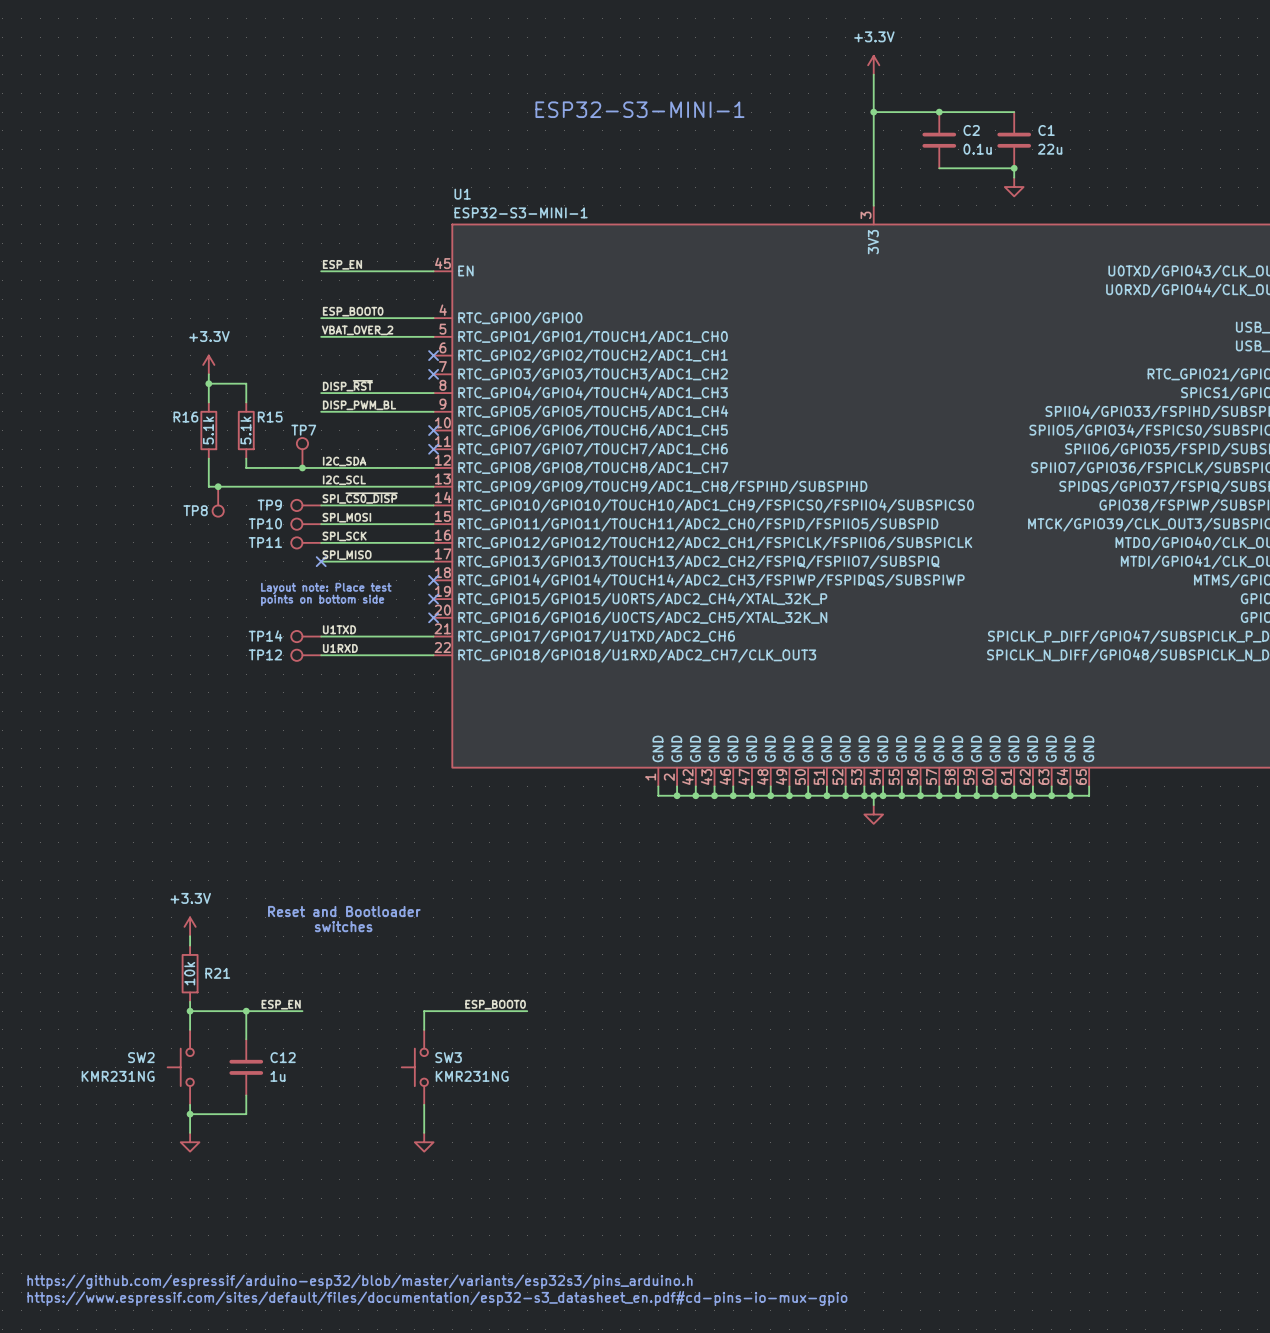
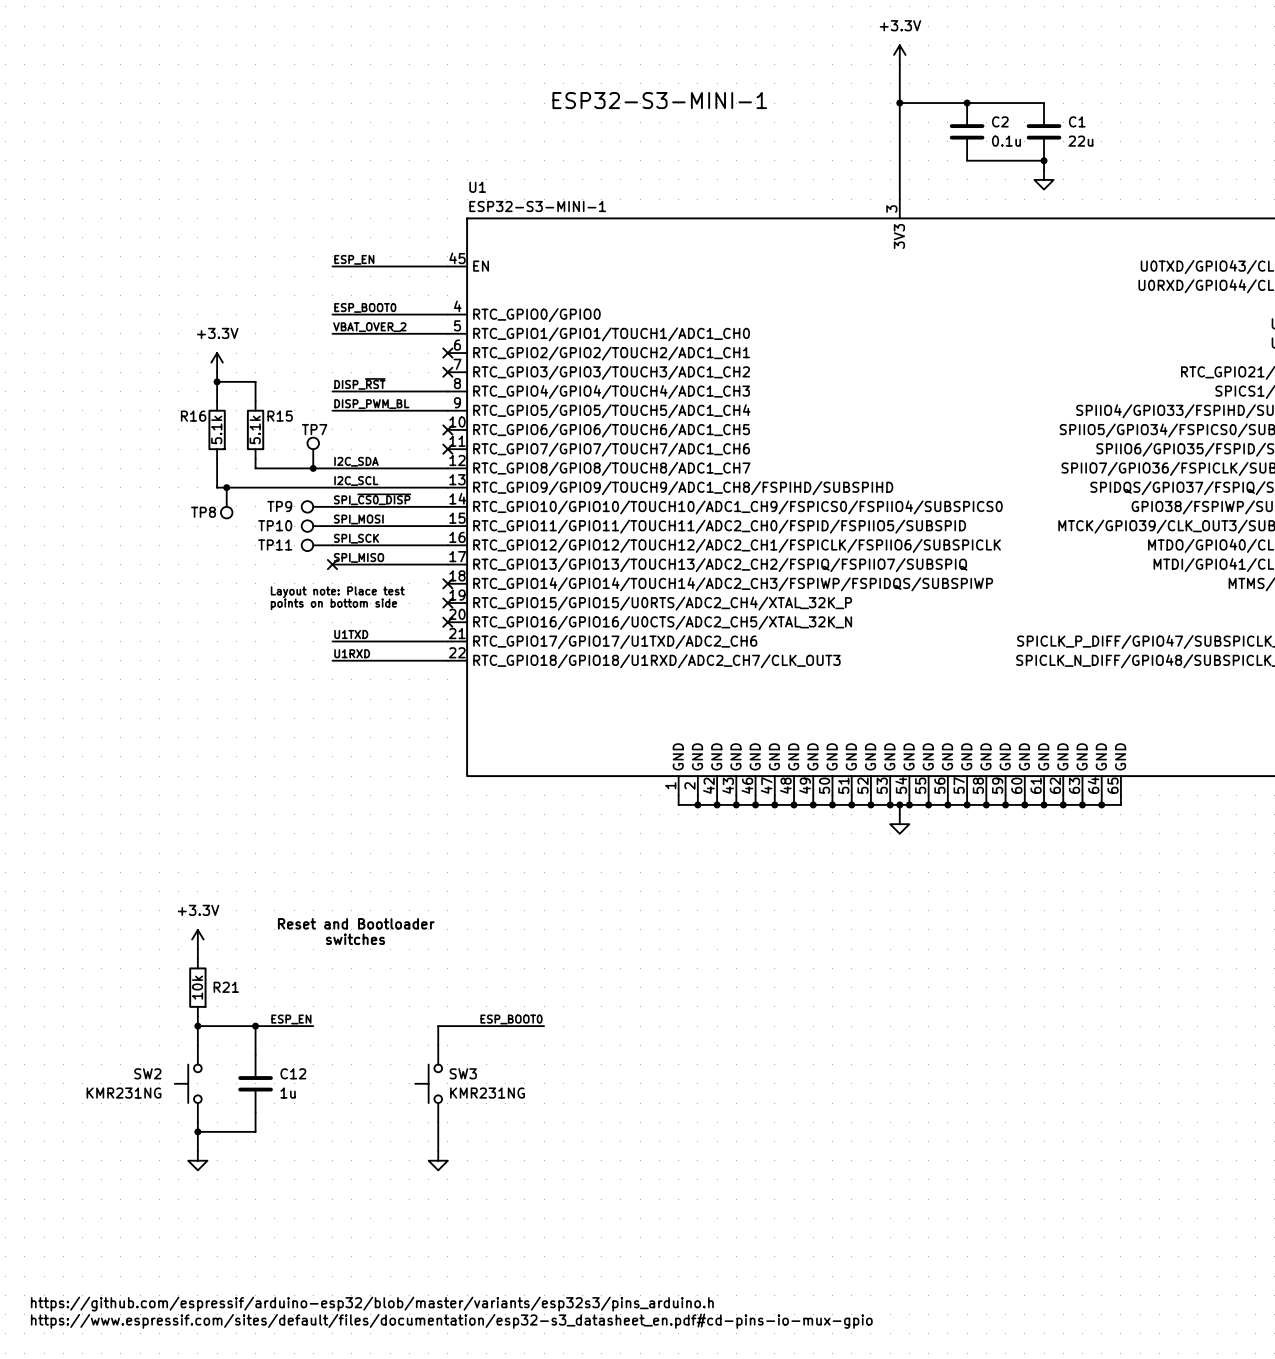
TP14: (306, 636) -> none
TP12: (306, 655) -> none

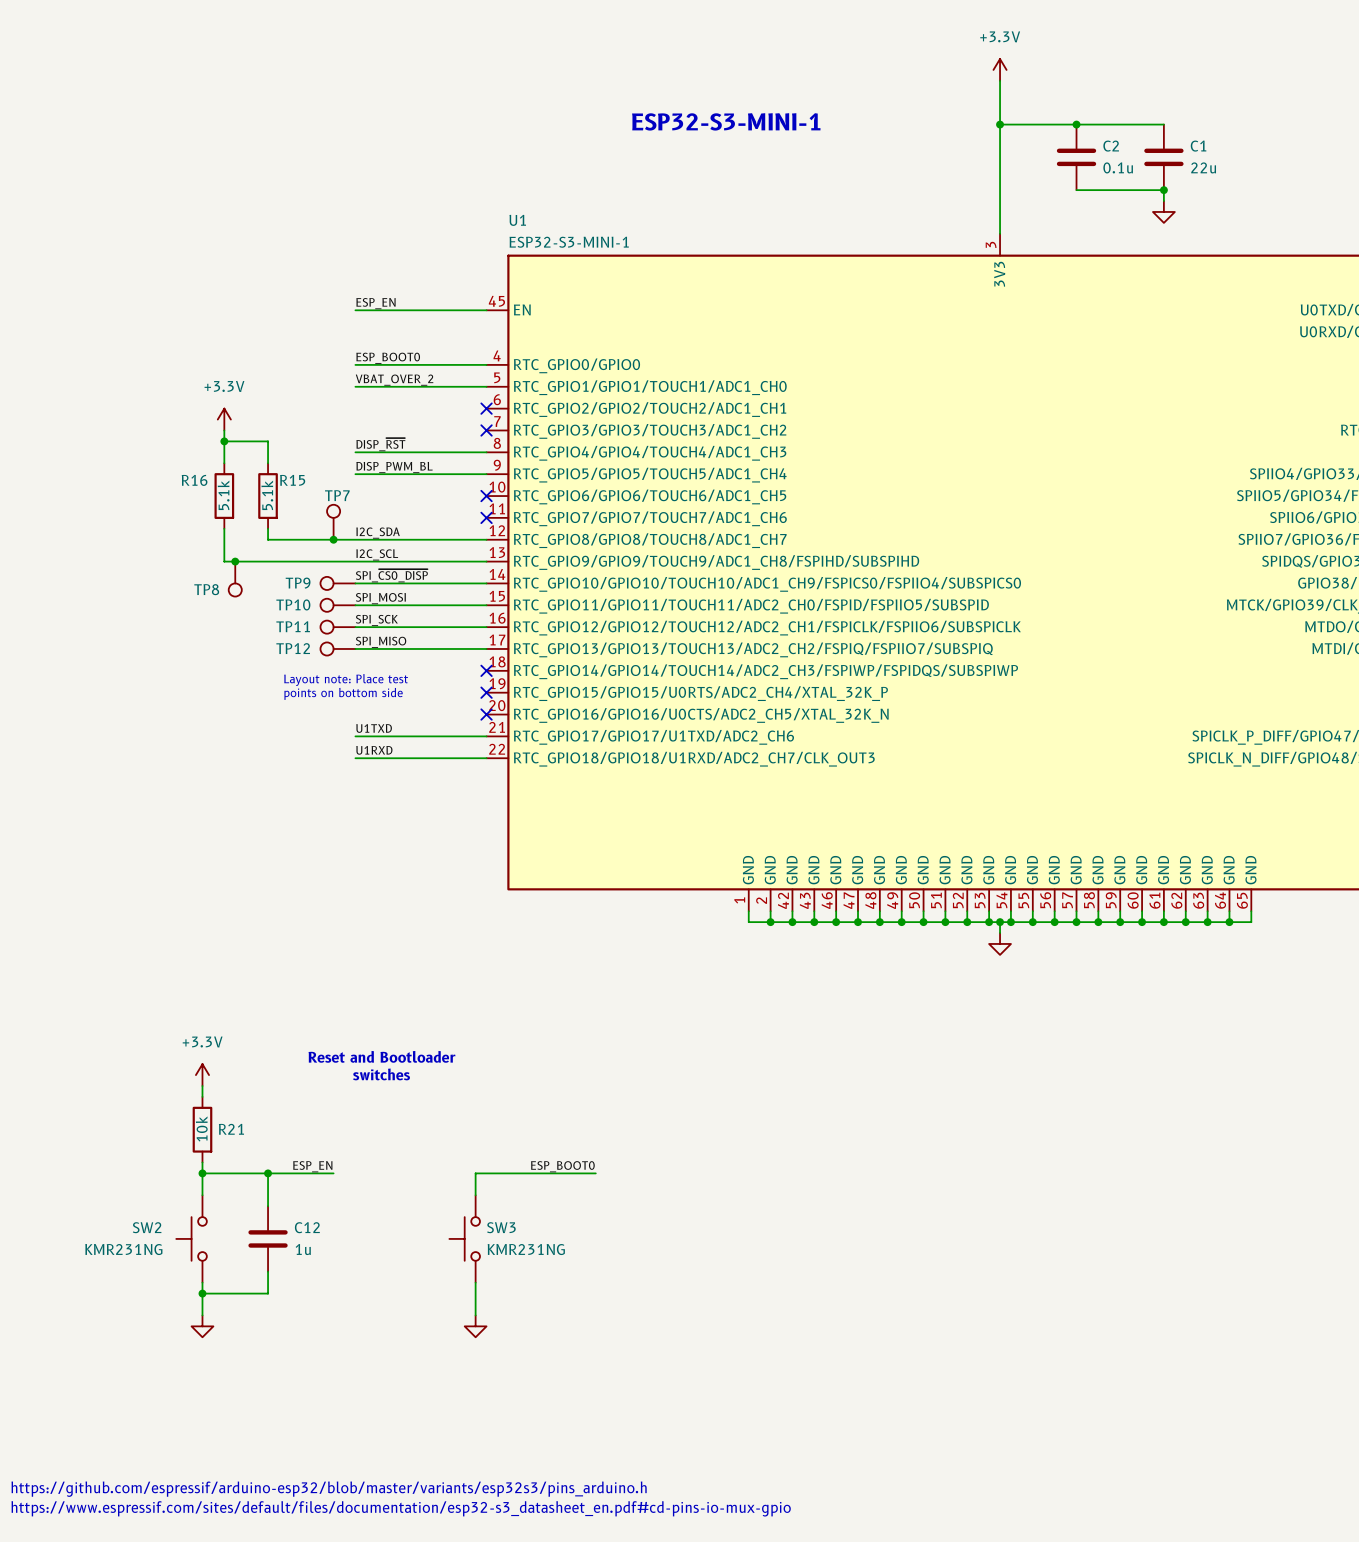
TP12: none -> (337, 648)
no-connect mark: (332, 564) -> none

